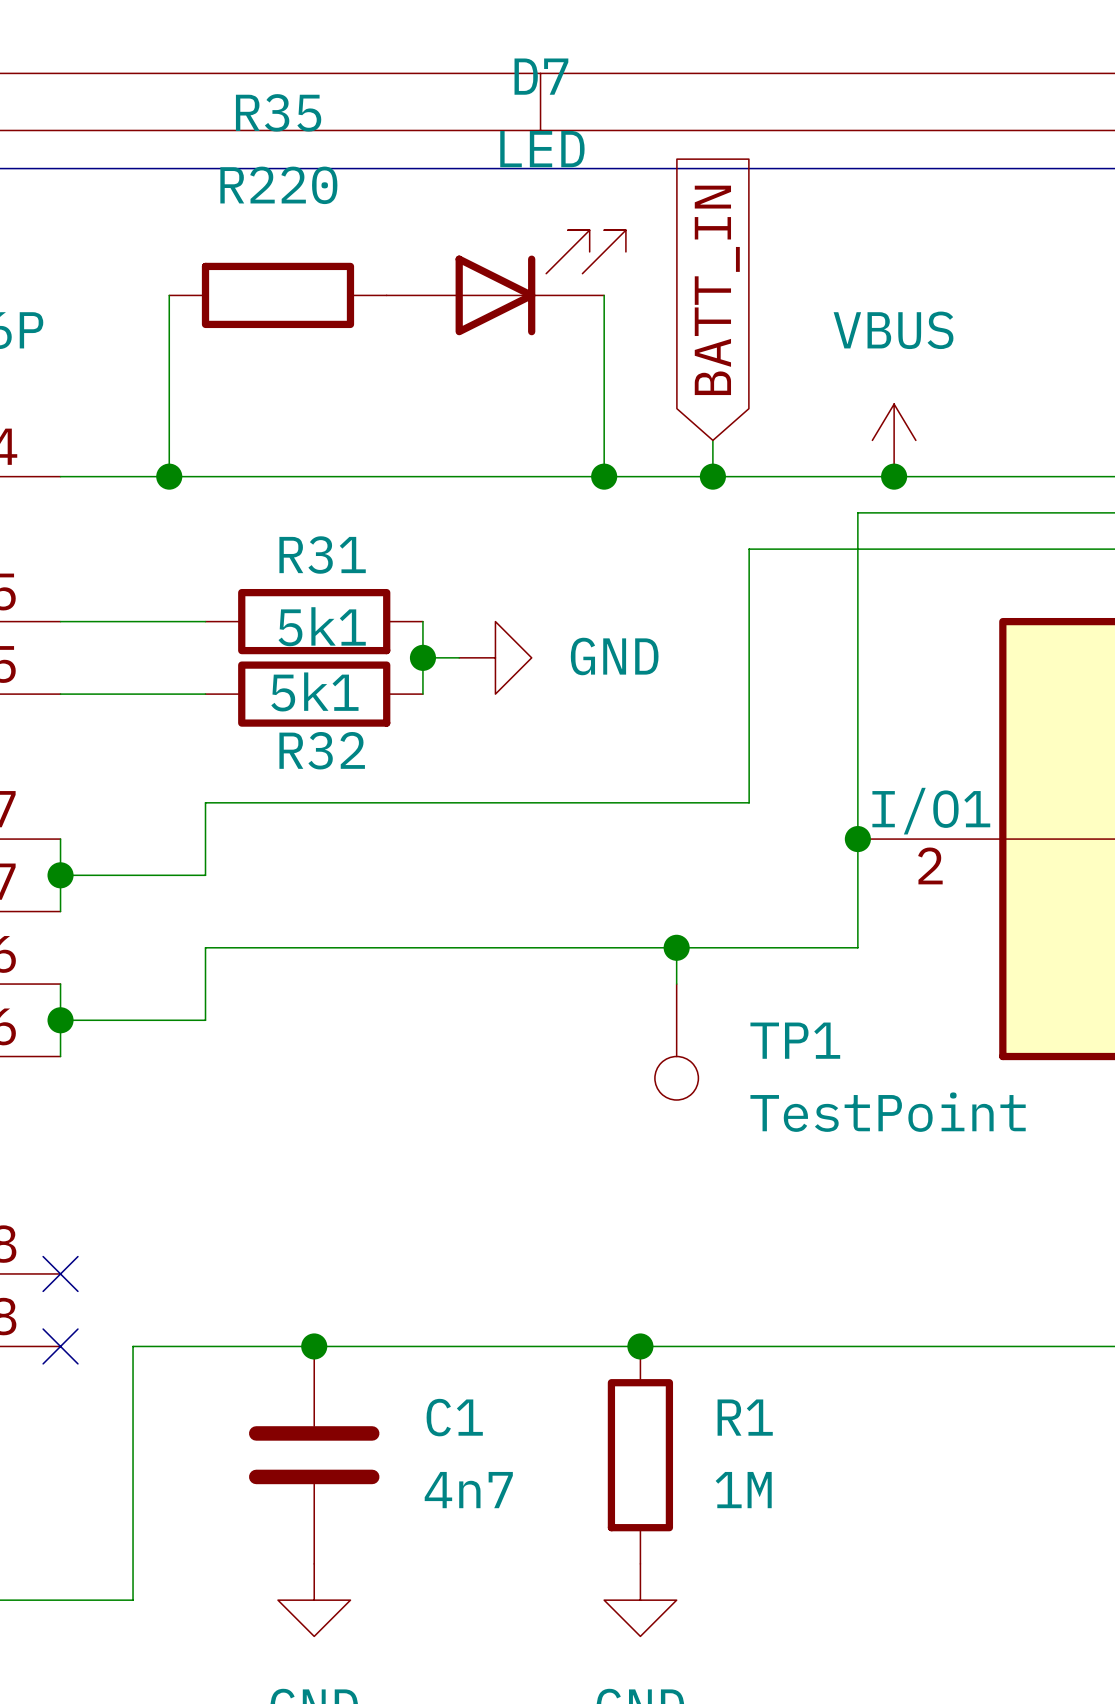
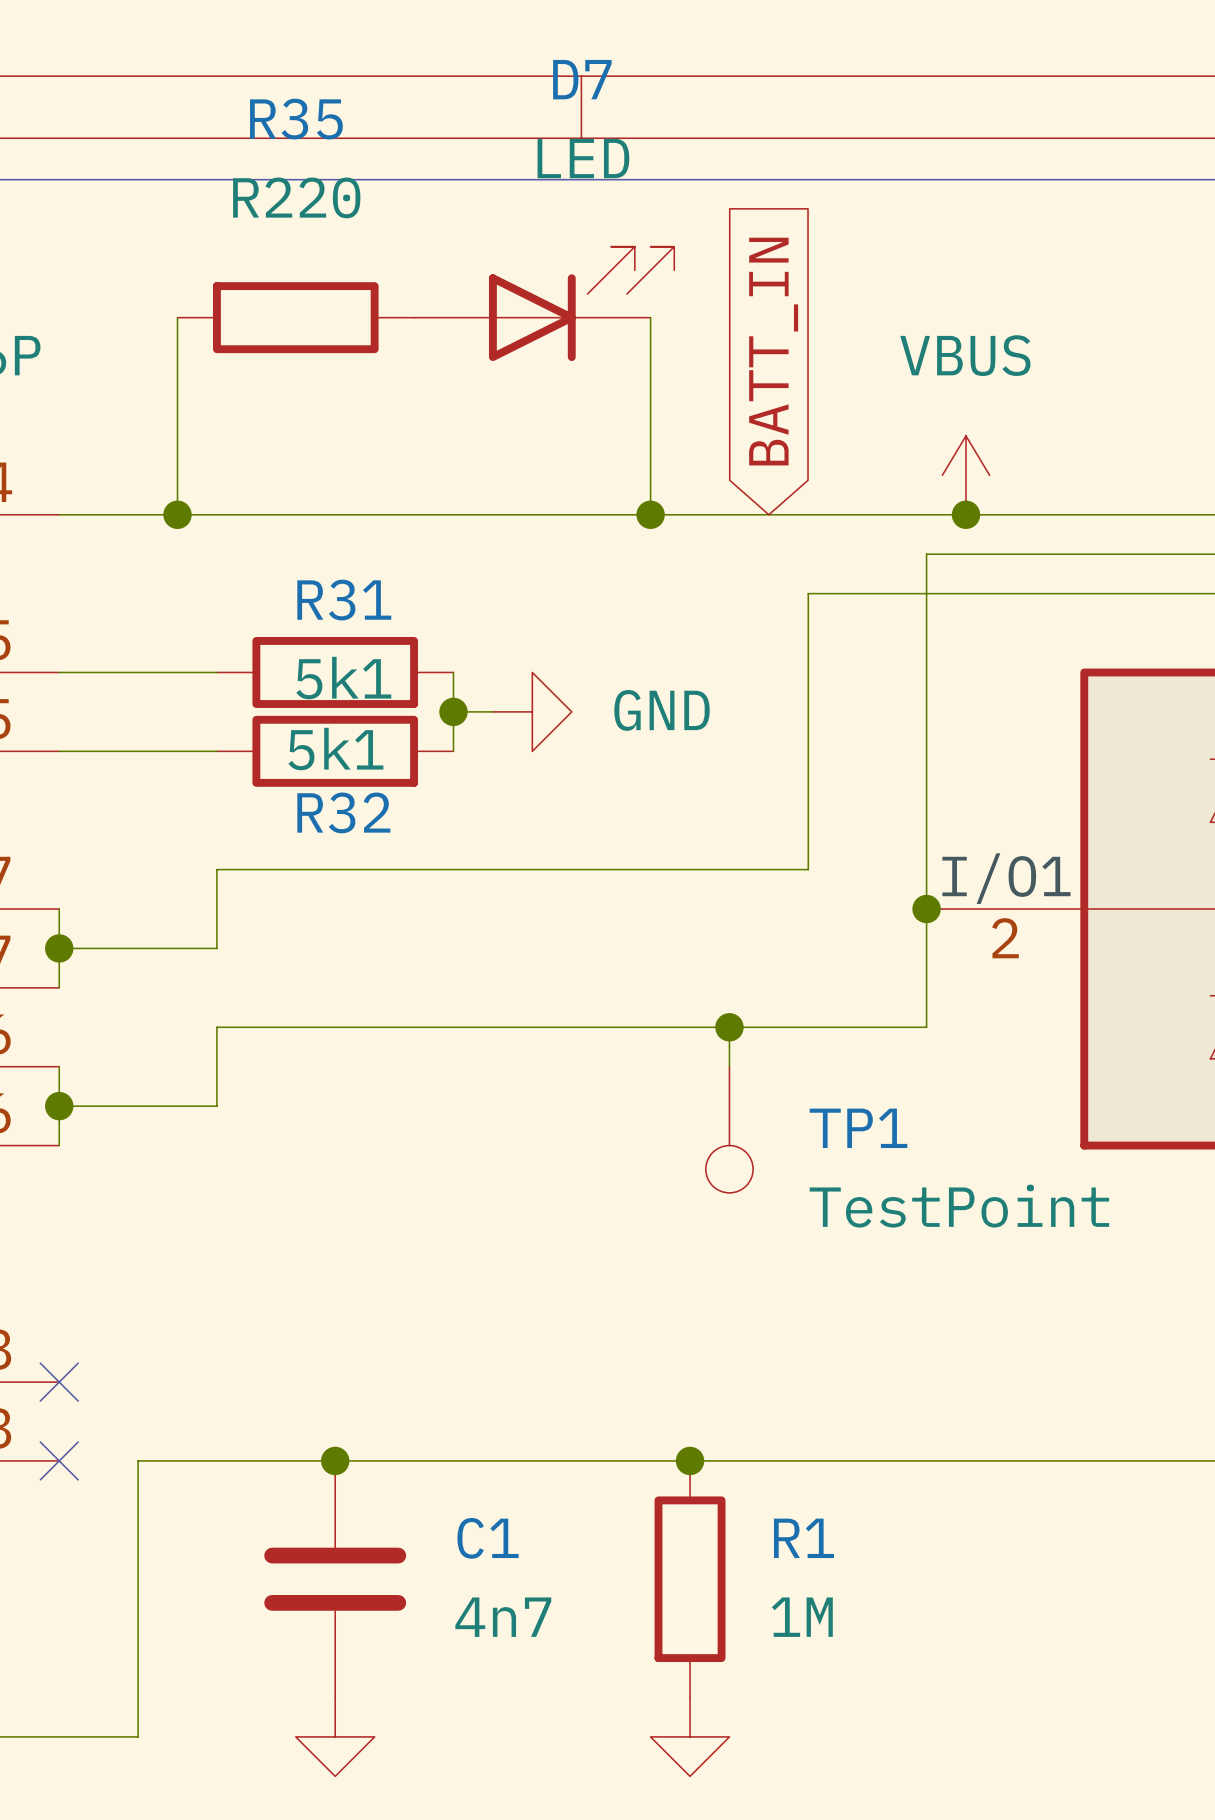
global label position: BATT_IN (717, 290) -> BATT_IN (773, 351)
wire: (712, 440) (712, 476) -> none
junction: (712, 476) -> none

